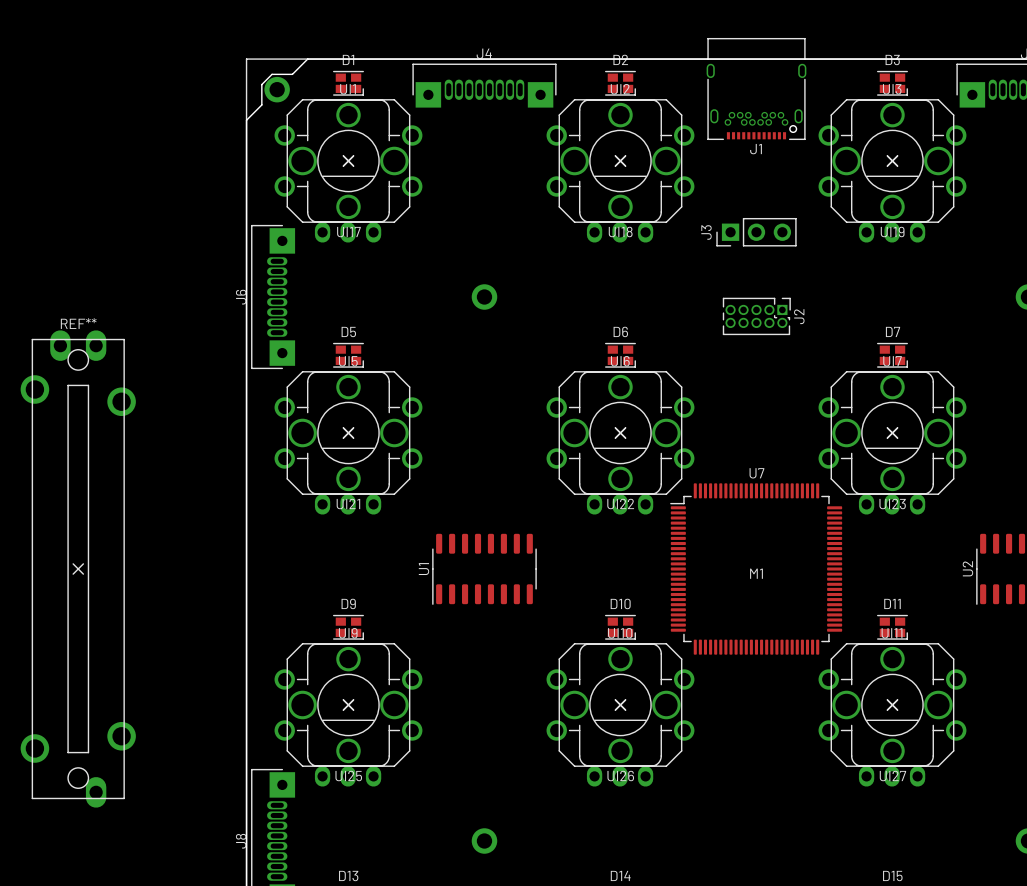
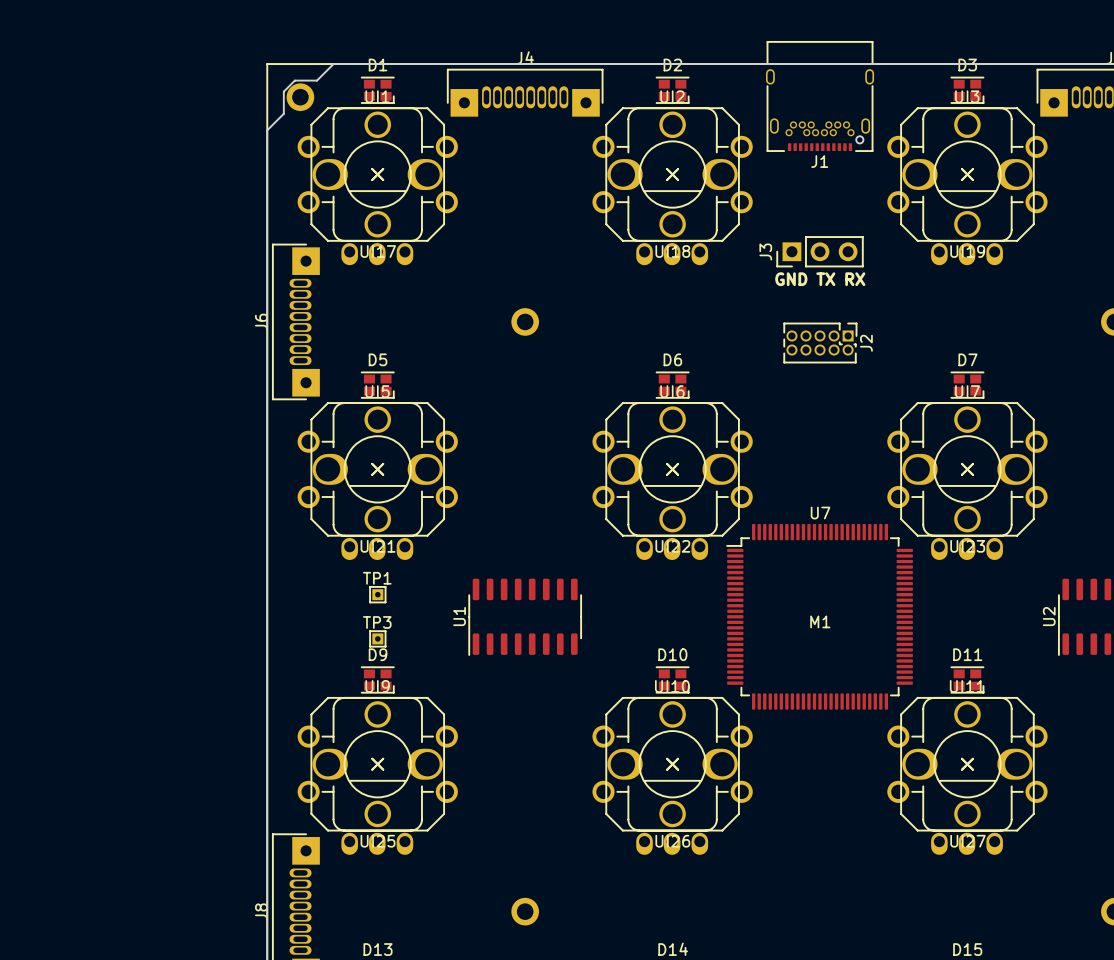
UI1 footprint: [288, 99, 409, 243] -> [312, 107, 443, 266]
UI2 footprint: [560, 99, 681, 243] -> [607, 107, 738, 266]
UI3 footprint: [832, 99, 953, 243] -> [902, 107, 1033, 266]
text: none -> GND TX RX (820, 279)
UI5 footprint: [288, 371, 409, 515] -> [312, 402, 443, 561]
UI6 footprint: [560, 371, 681, 515] -> [607, 402, 738, 561]
UI7 footprint: [832, 371, 953, 515] -> [902, 402, 1033, 561]
TP1: none -> (377, 594)
REF**: (78, 569) -> none
TP3: none -> (377, 638)
UI9 footprint: [288, 643, 409, 787] -> [312, 697, 443, 855]
UI10 footprint: [560, 643, 681, 787] -> [607, 697, 738, 855]
UI11 footprint: [832, 643, 953, 787] -> [902, 697, 1033, 855]

